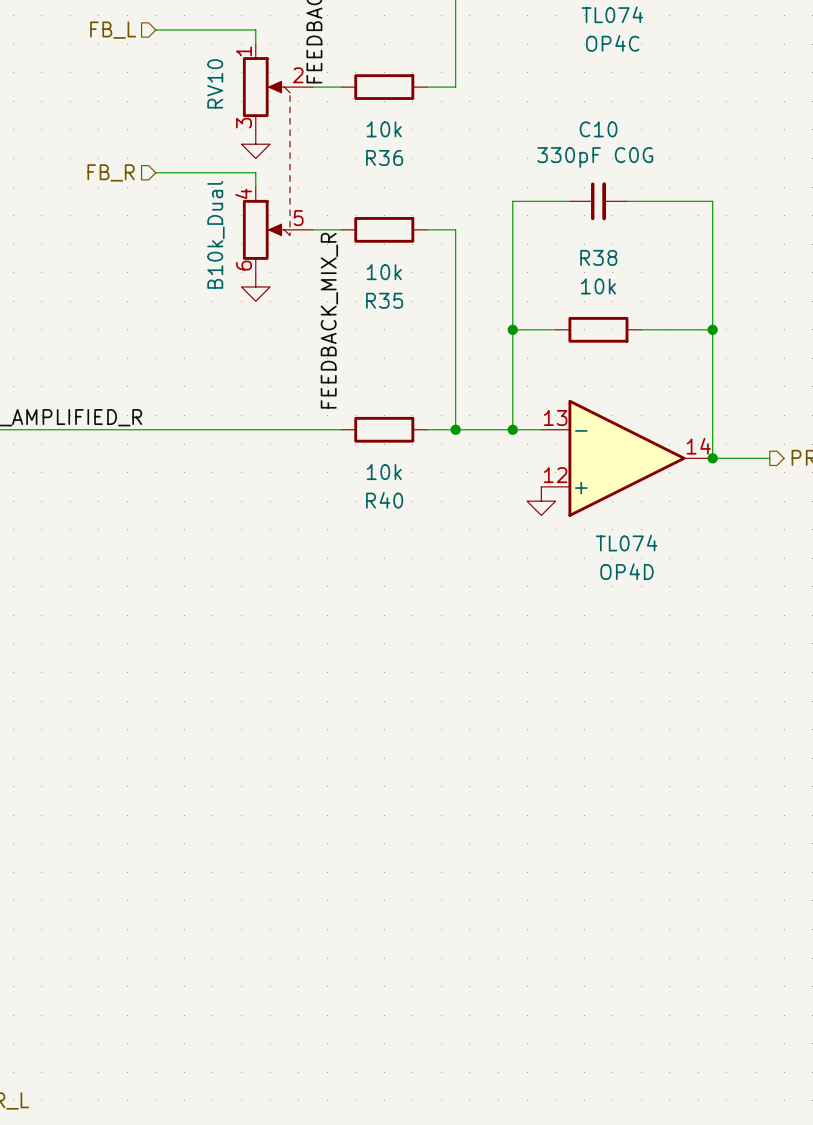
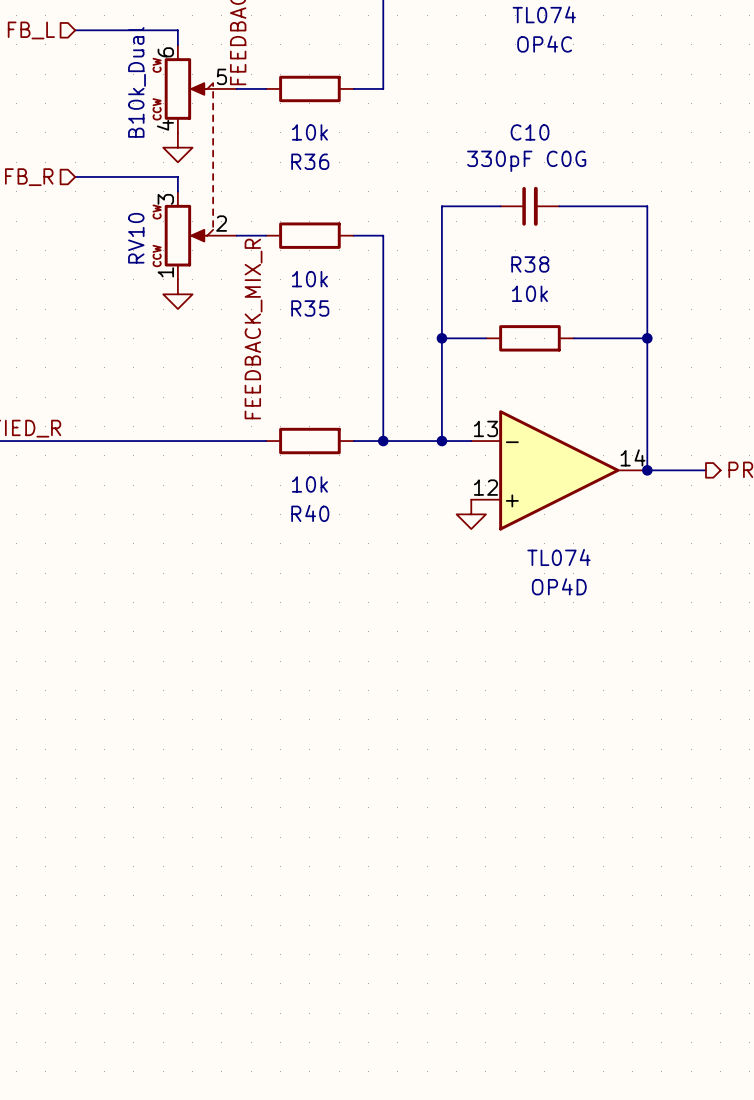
RV10 symbol: [242, 44, 313, 273] -> [164, 44, 237, 280]
RV10 name position: RV10 (215, 83) -> RV10 (136, 238)
RV10 value position: B10k_Dual (215, 234) -> B10k_Dual (136, 82)

